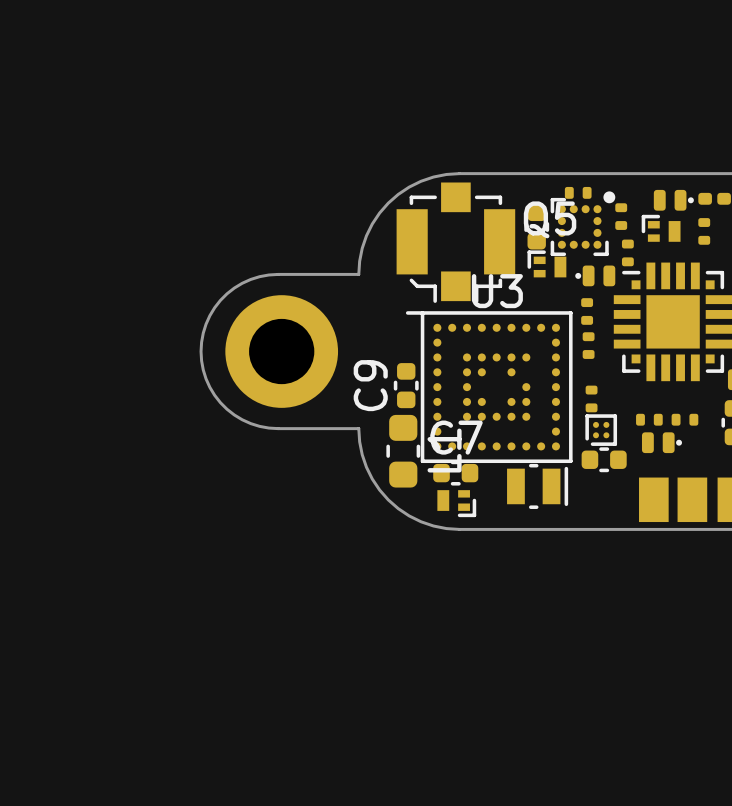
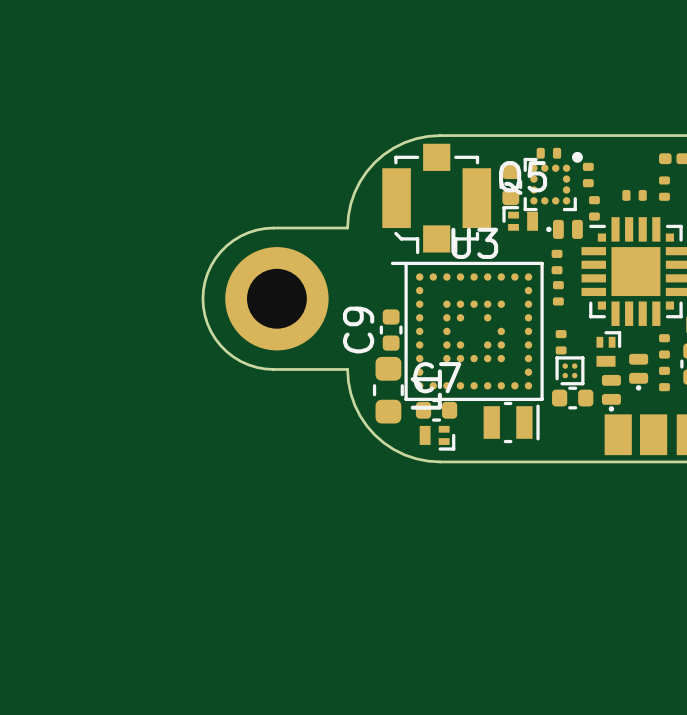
part: (673, 200) -> none
part footprint: [641, 214, 681, 242] -> [622, 189, 647, 201]
part: none -> (664, 346)
part: none -> (608, 348)
part: (649, 419) -> none
part: (684, 419) -> none
part: none -> (638, 372)
part: none -> (664, 378)
part: (661, 442) -> none
part: none -> (611, 393)

